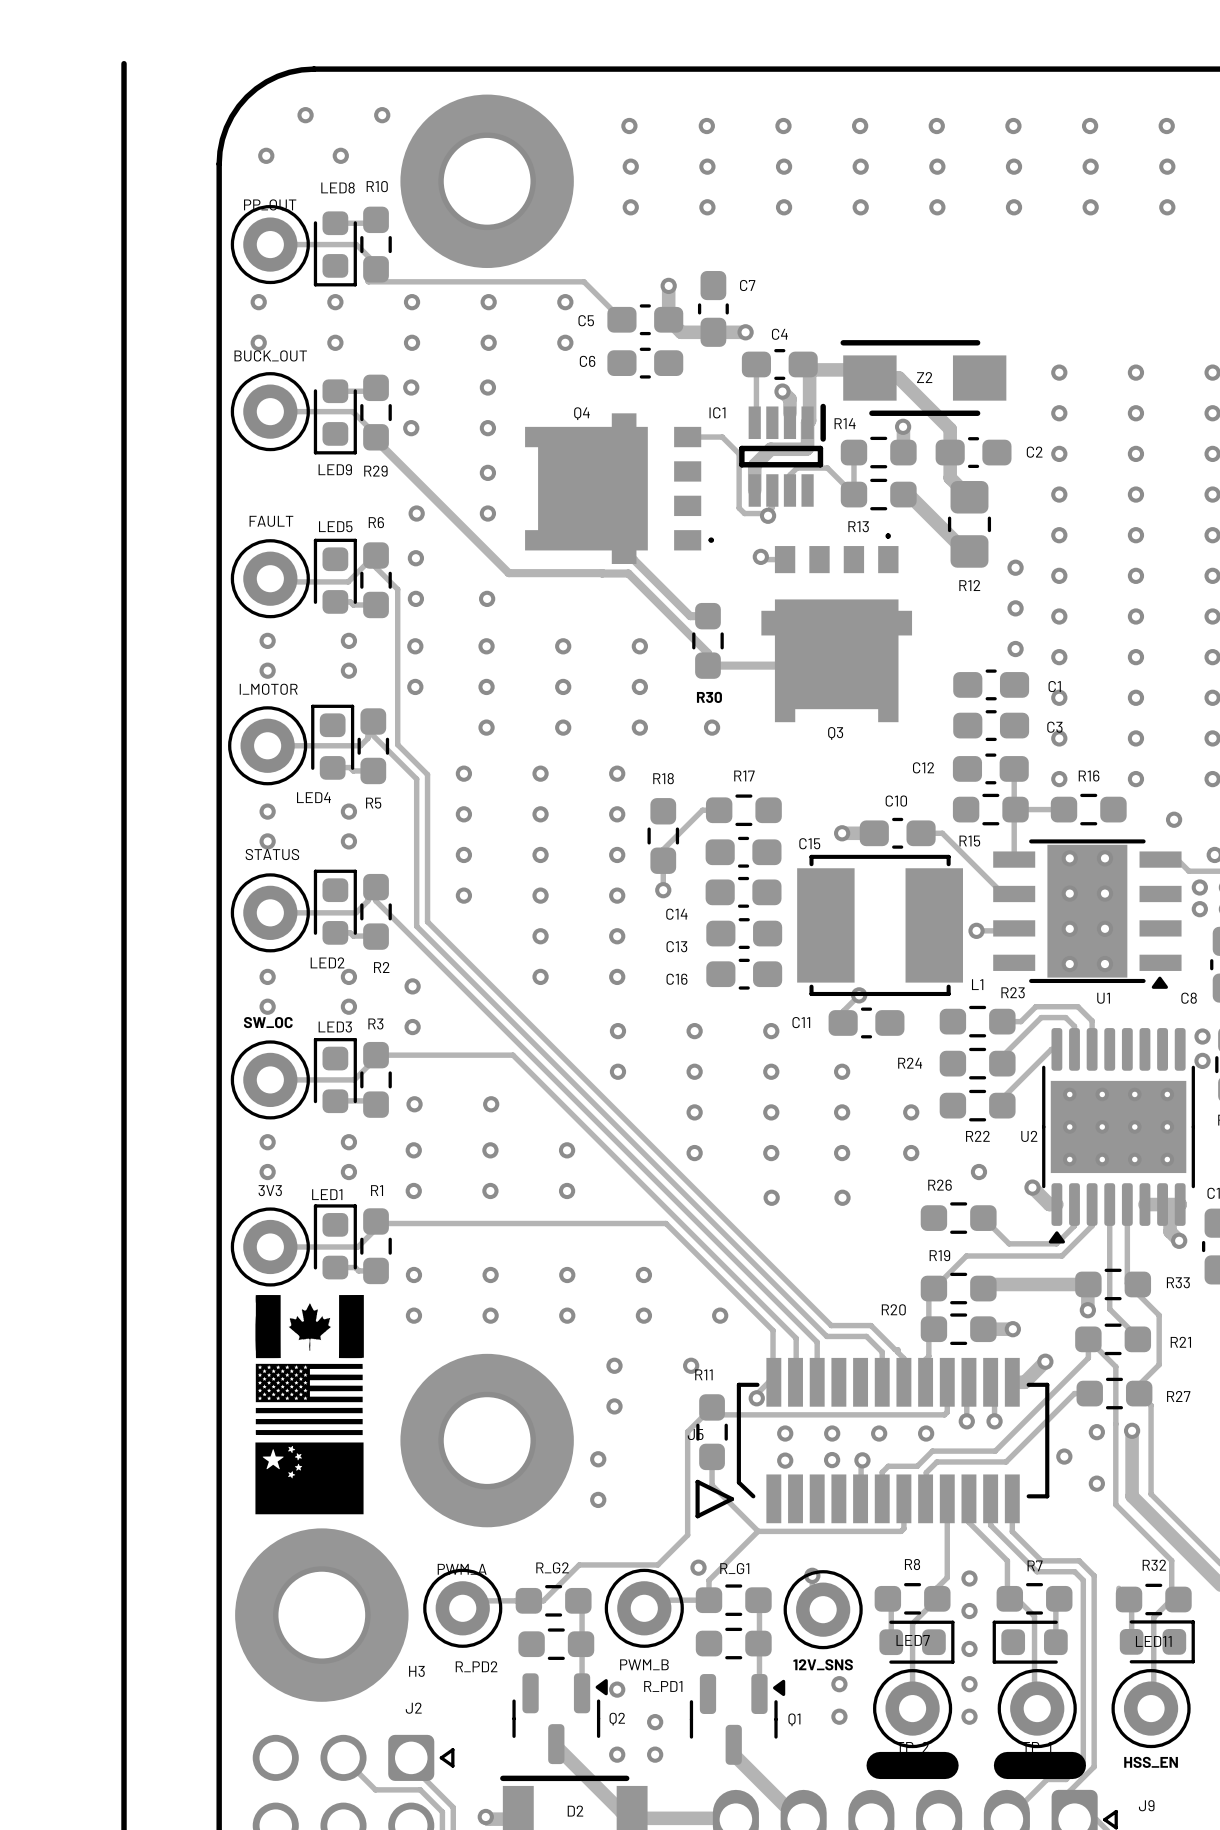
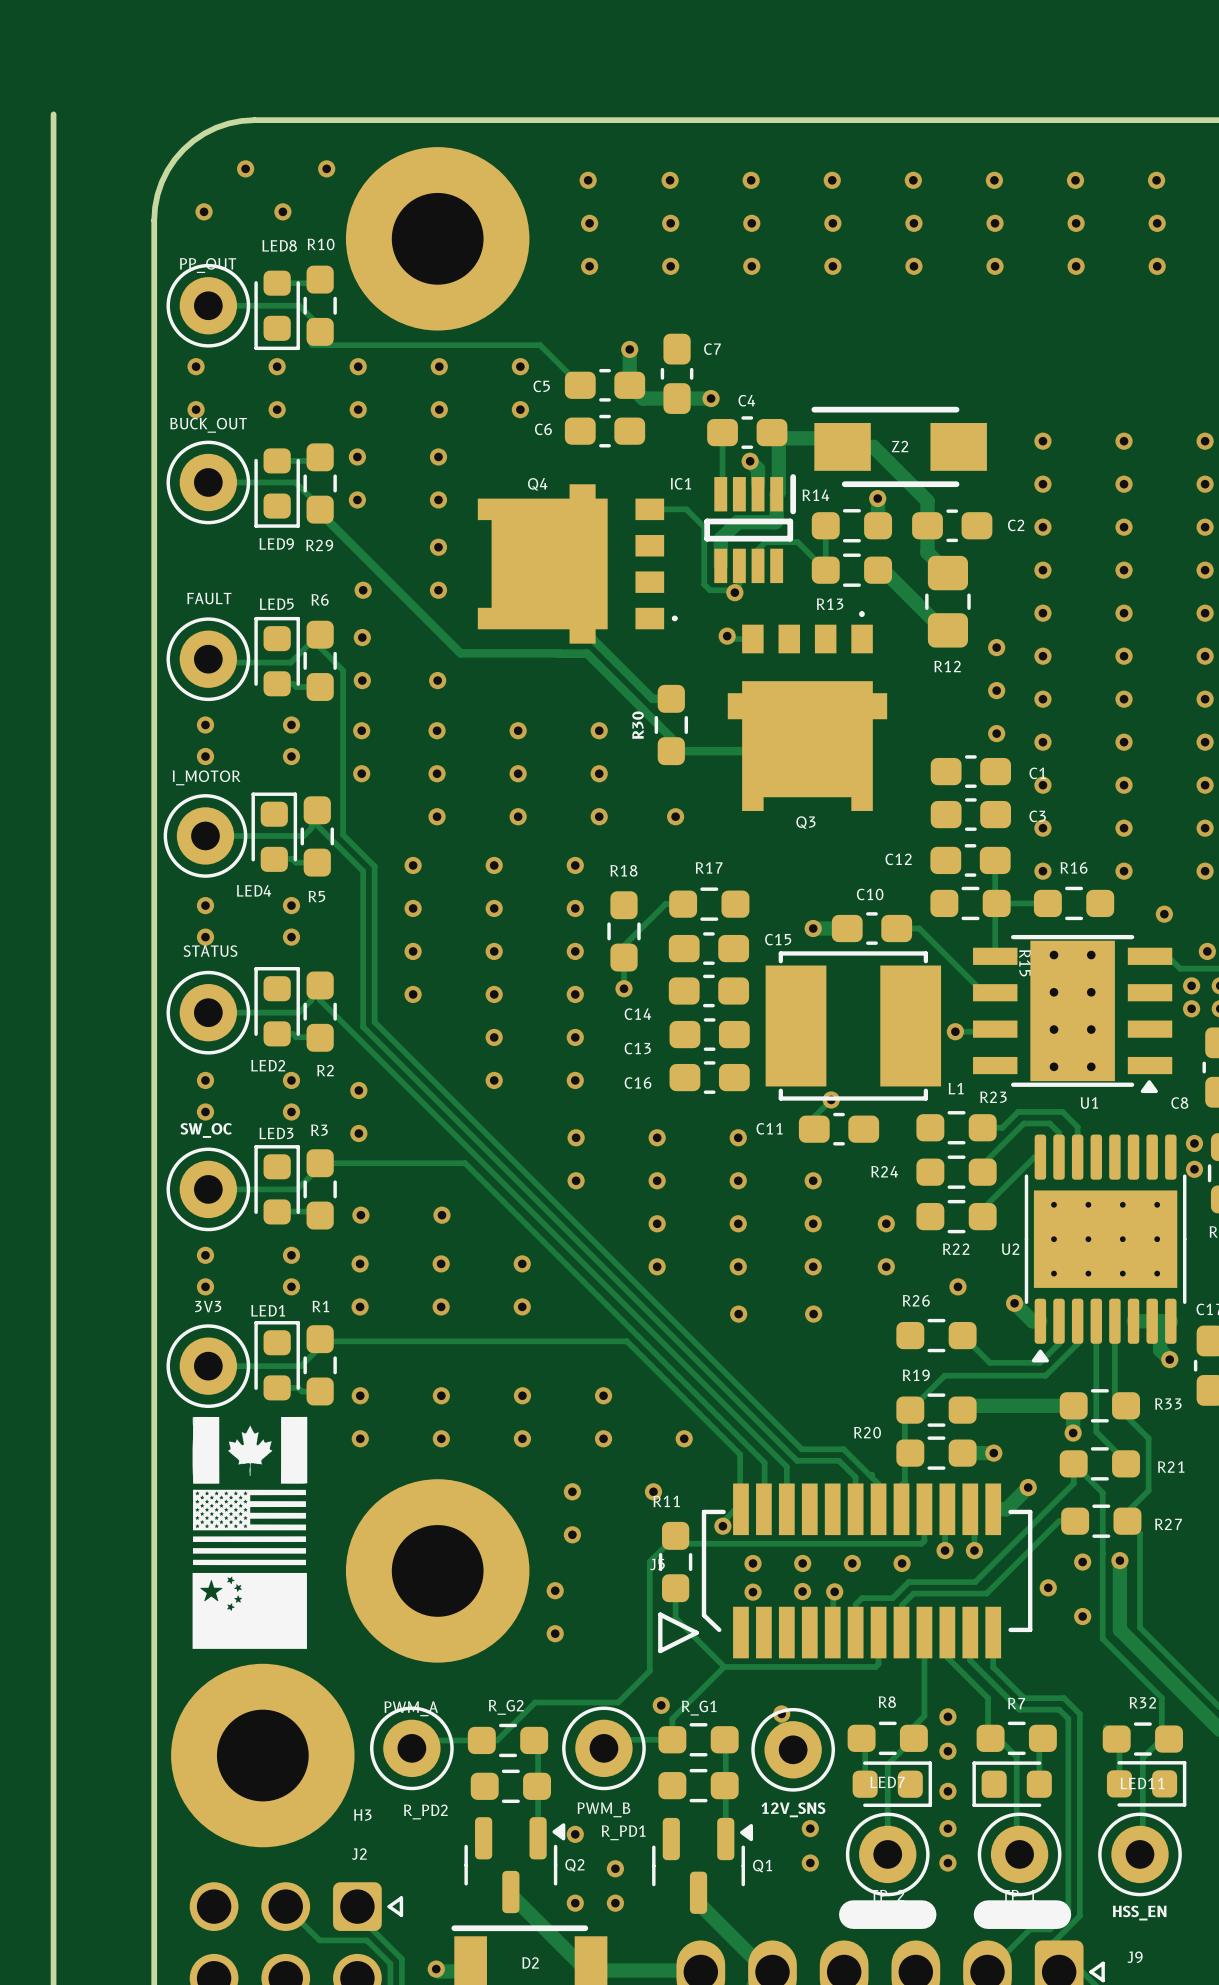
R30 name rotation: 0° (709, 697) -> 90° counterclockwise (638, 725)
R30 name position: R30 (709, 697) -> R30 (638, 725)
R15 name rotation: 0° (969, 841) -> 90° clockwise (1025, 963)
R15 name position: R15 (969, 841) -> R15 (1025, 963)

